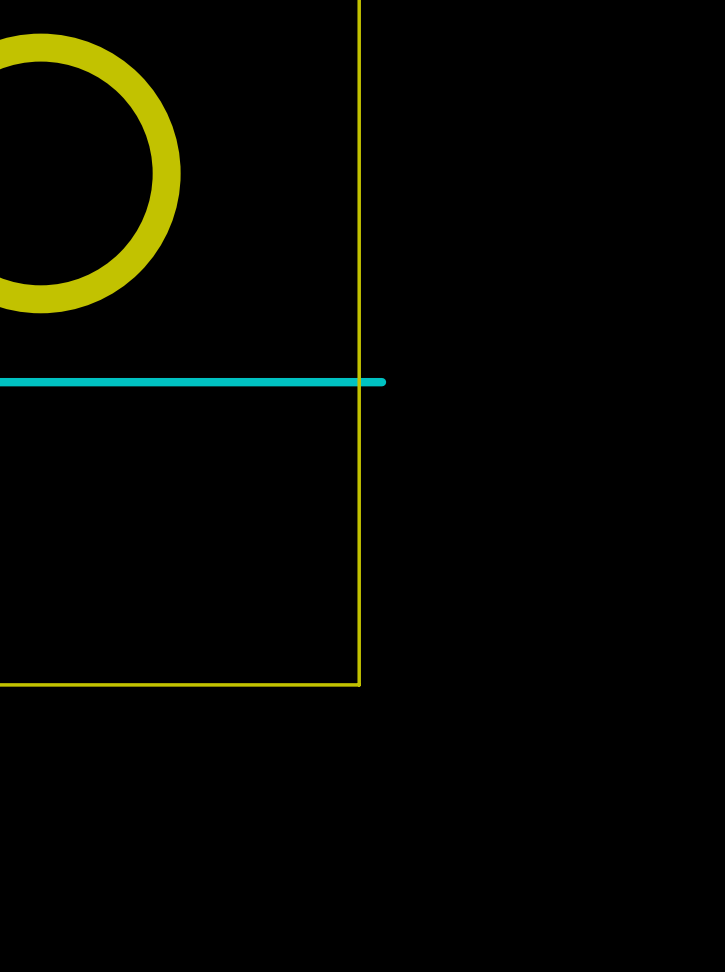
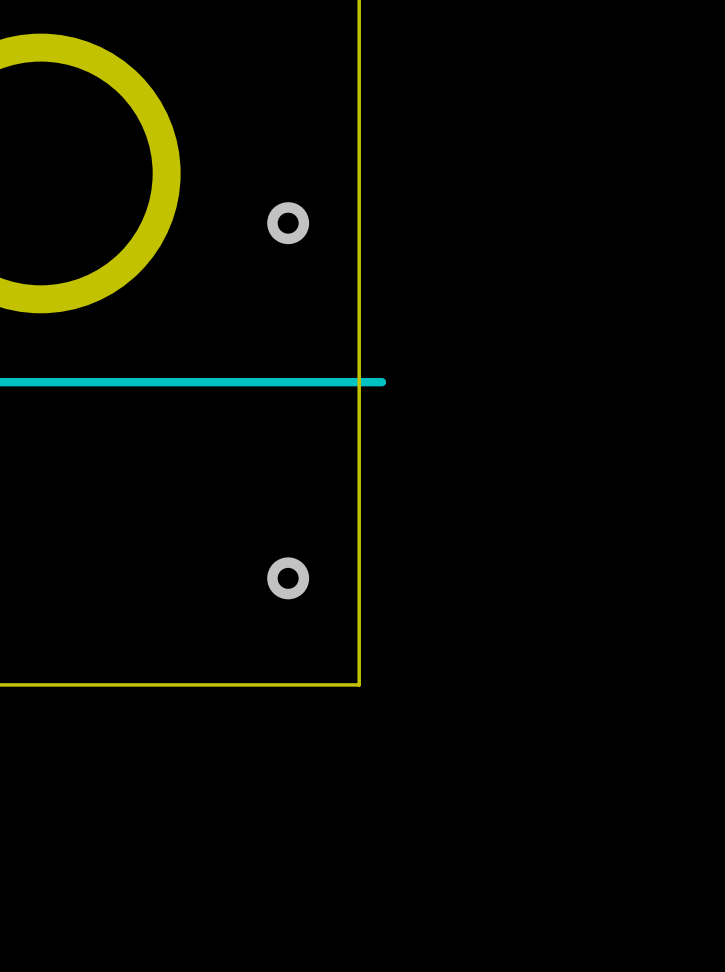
via: none -> (288, 223)
via: none -> (288, 578)

